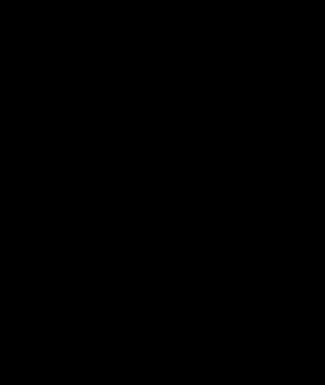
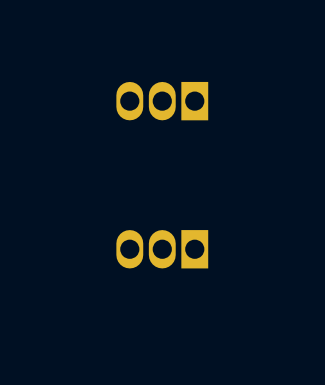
part: none -> (162, 101)
part: none -> (162, 249)

